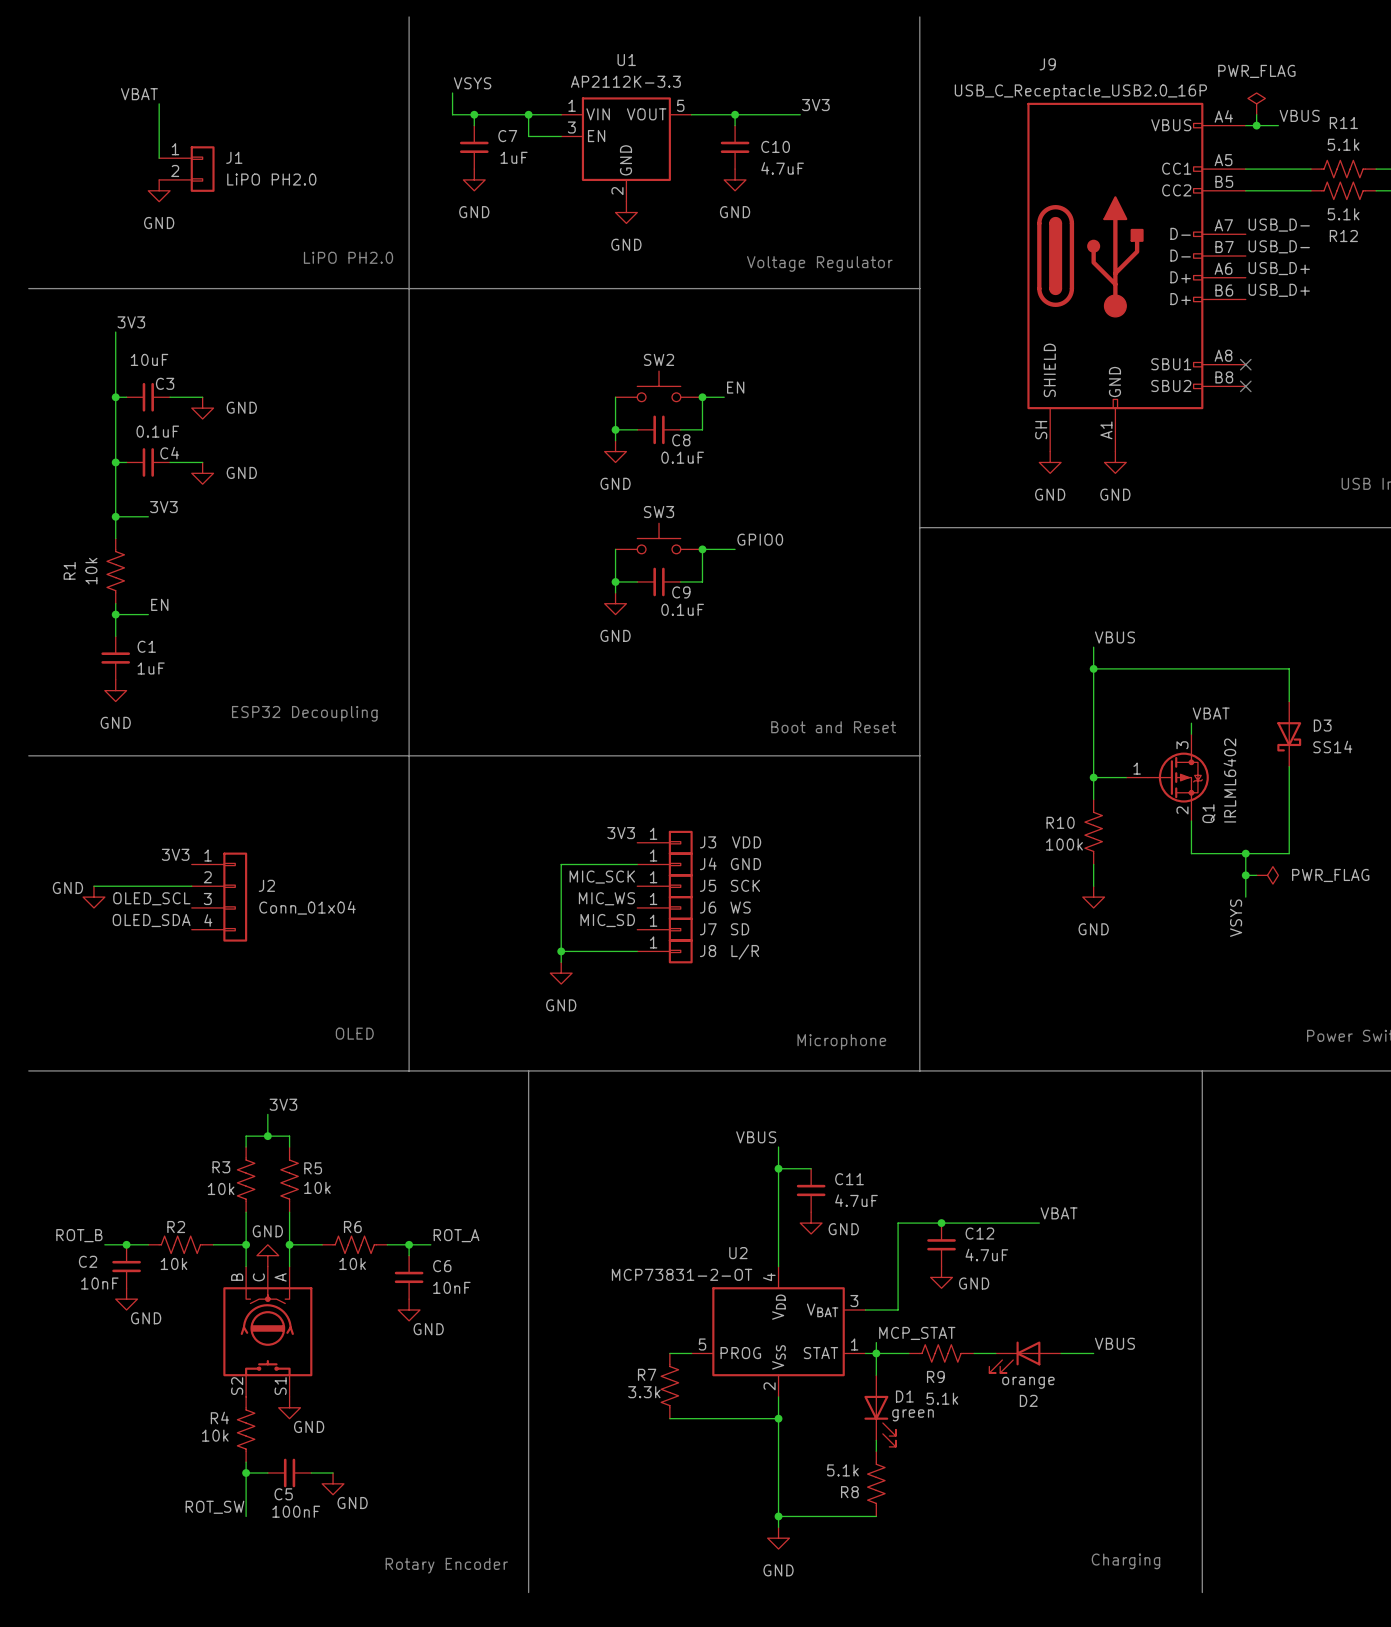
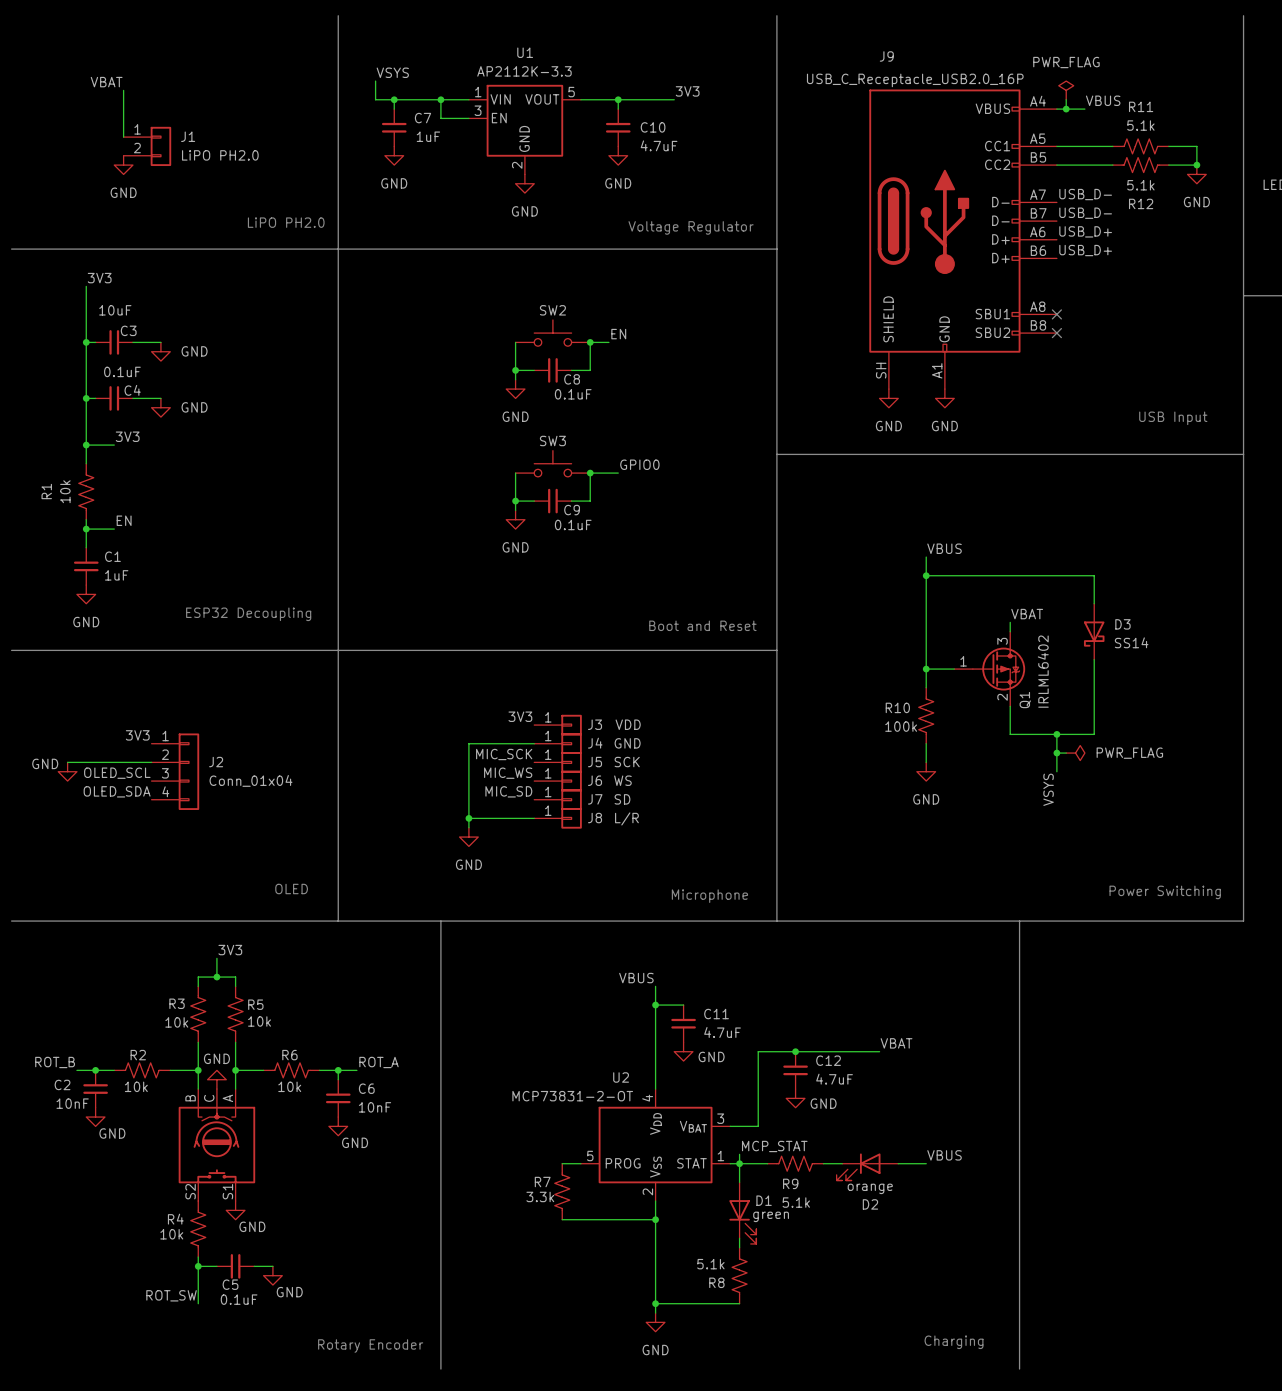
C5 value: 100nF (296, 1511) -> 0.1uF (239, 1299)

